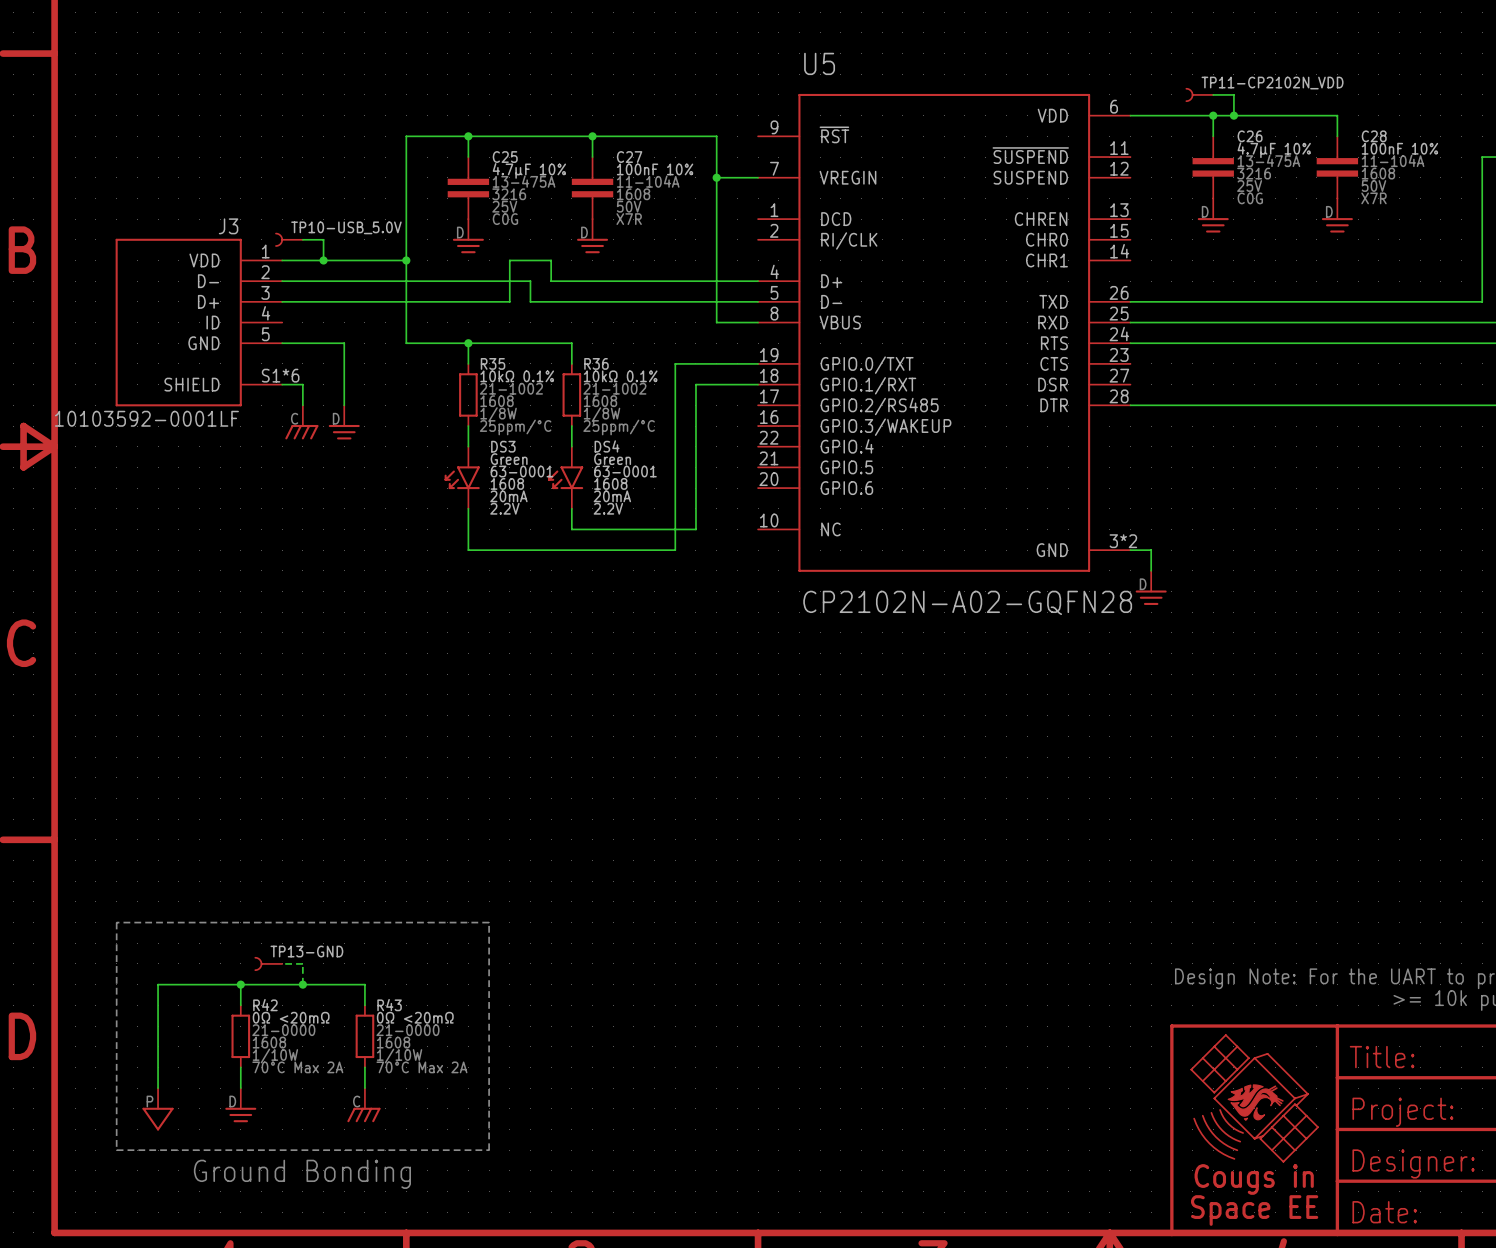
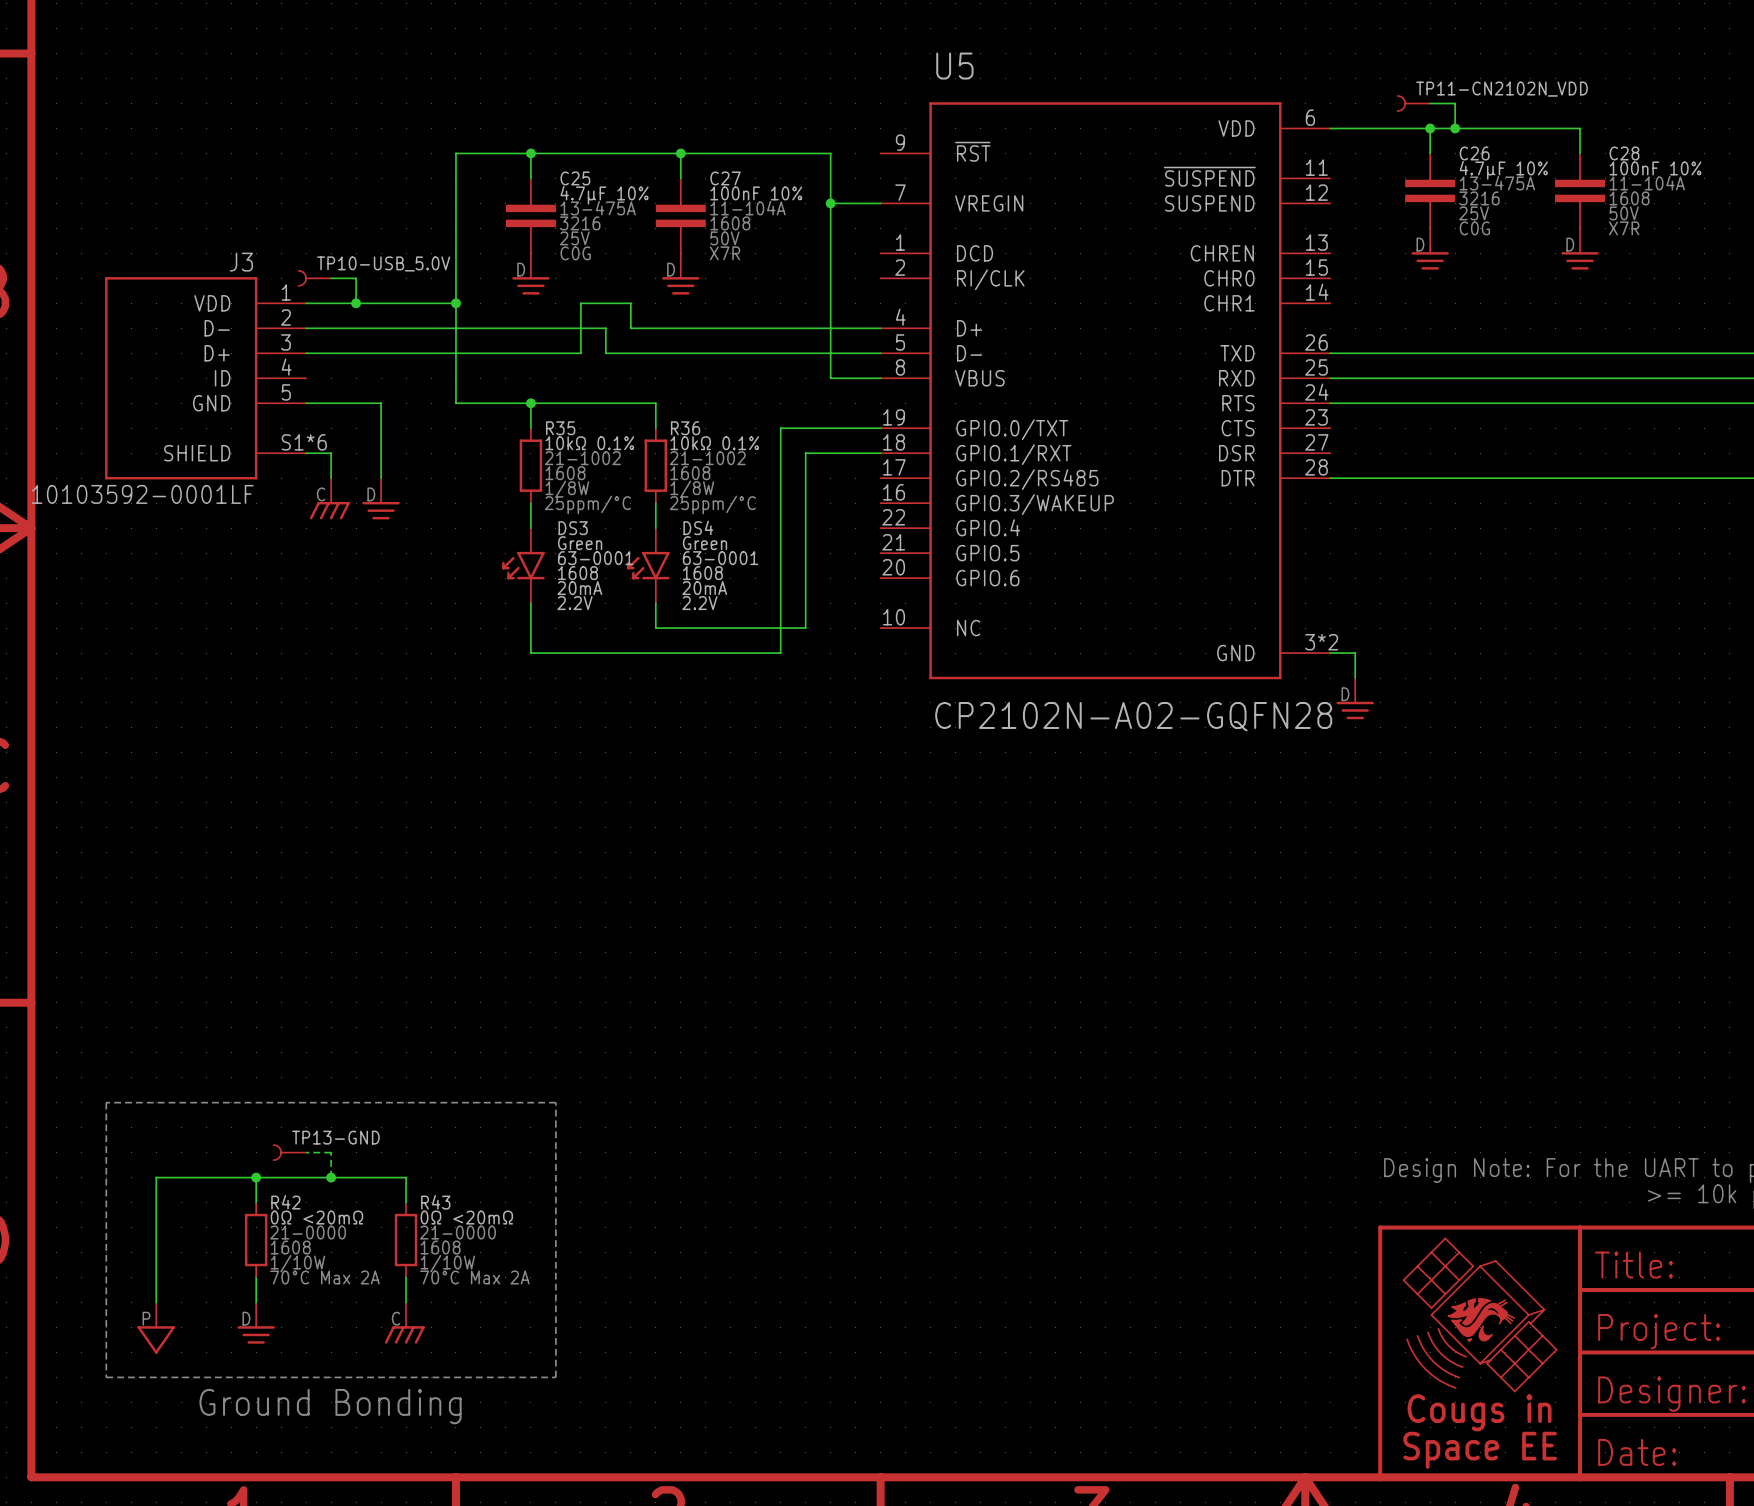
TP11-CP2102N_VDD name: TP11-CP2102N_VDD (1272, 83) -> TP11-CN2102N_VDD (1502, 89)

